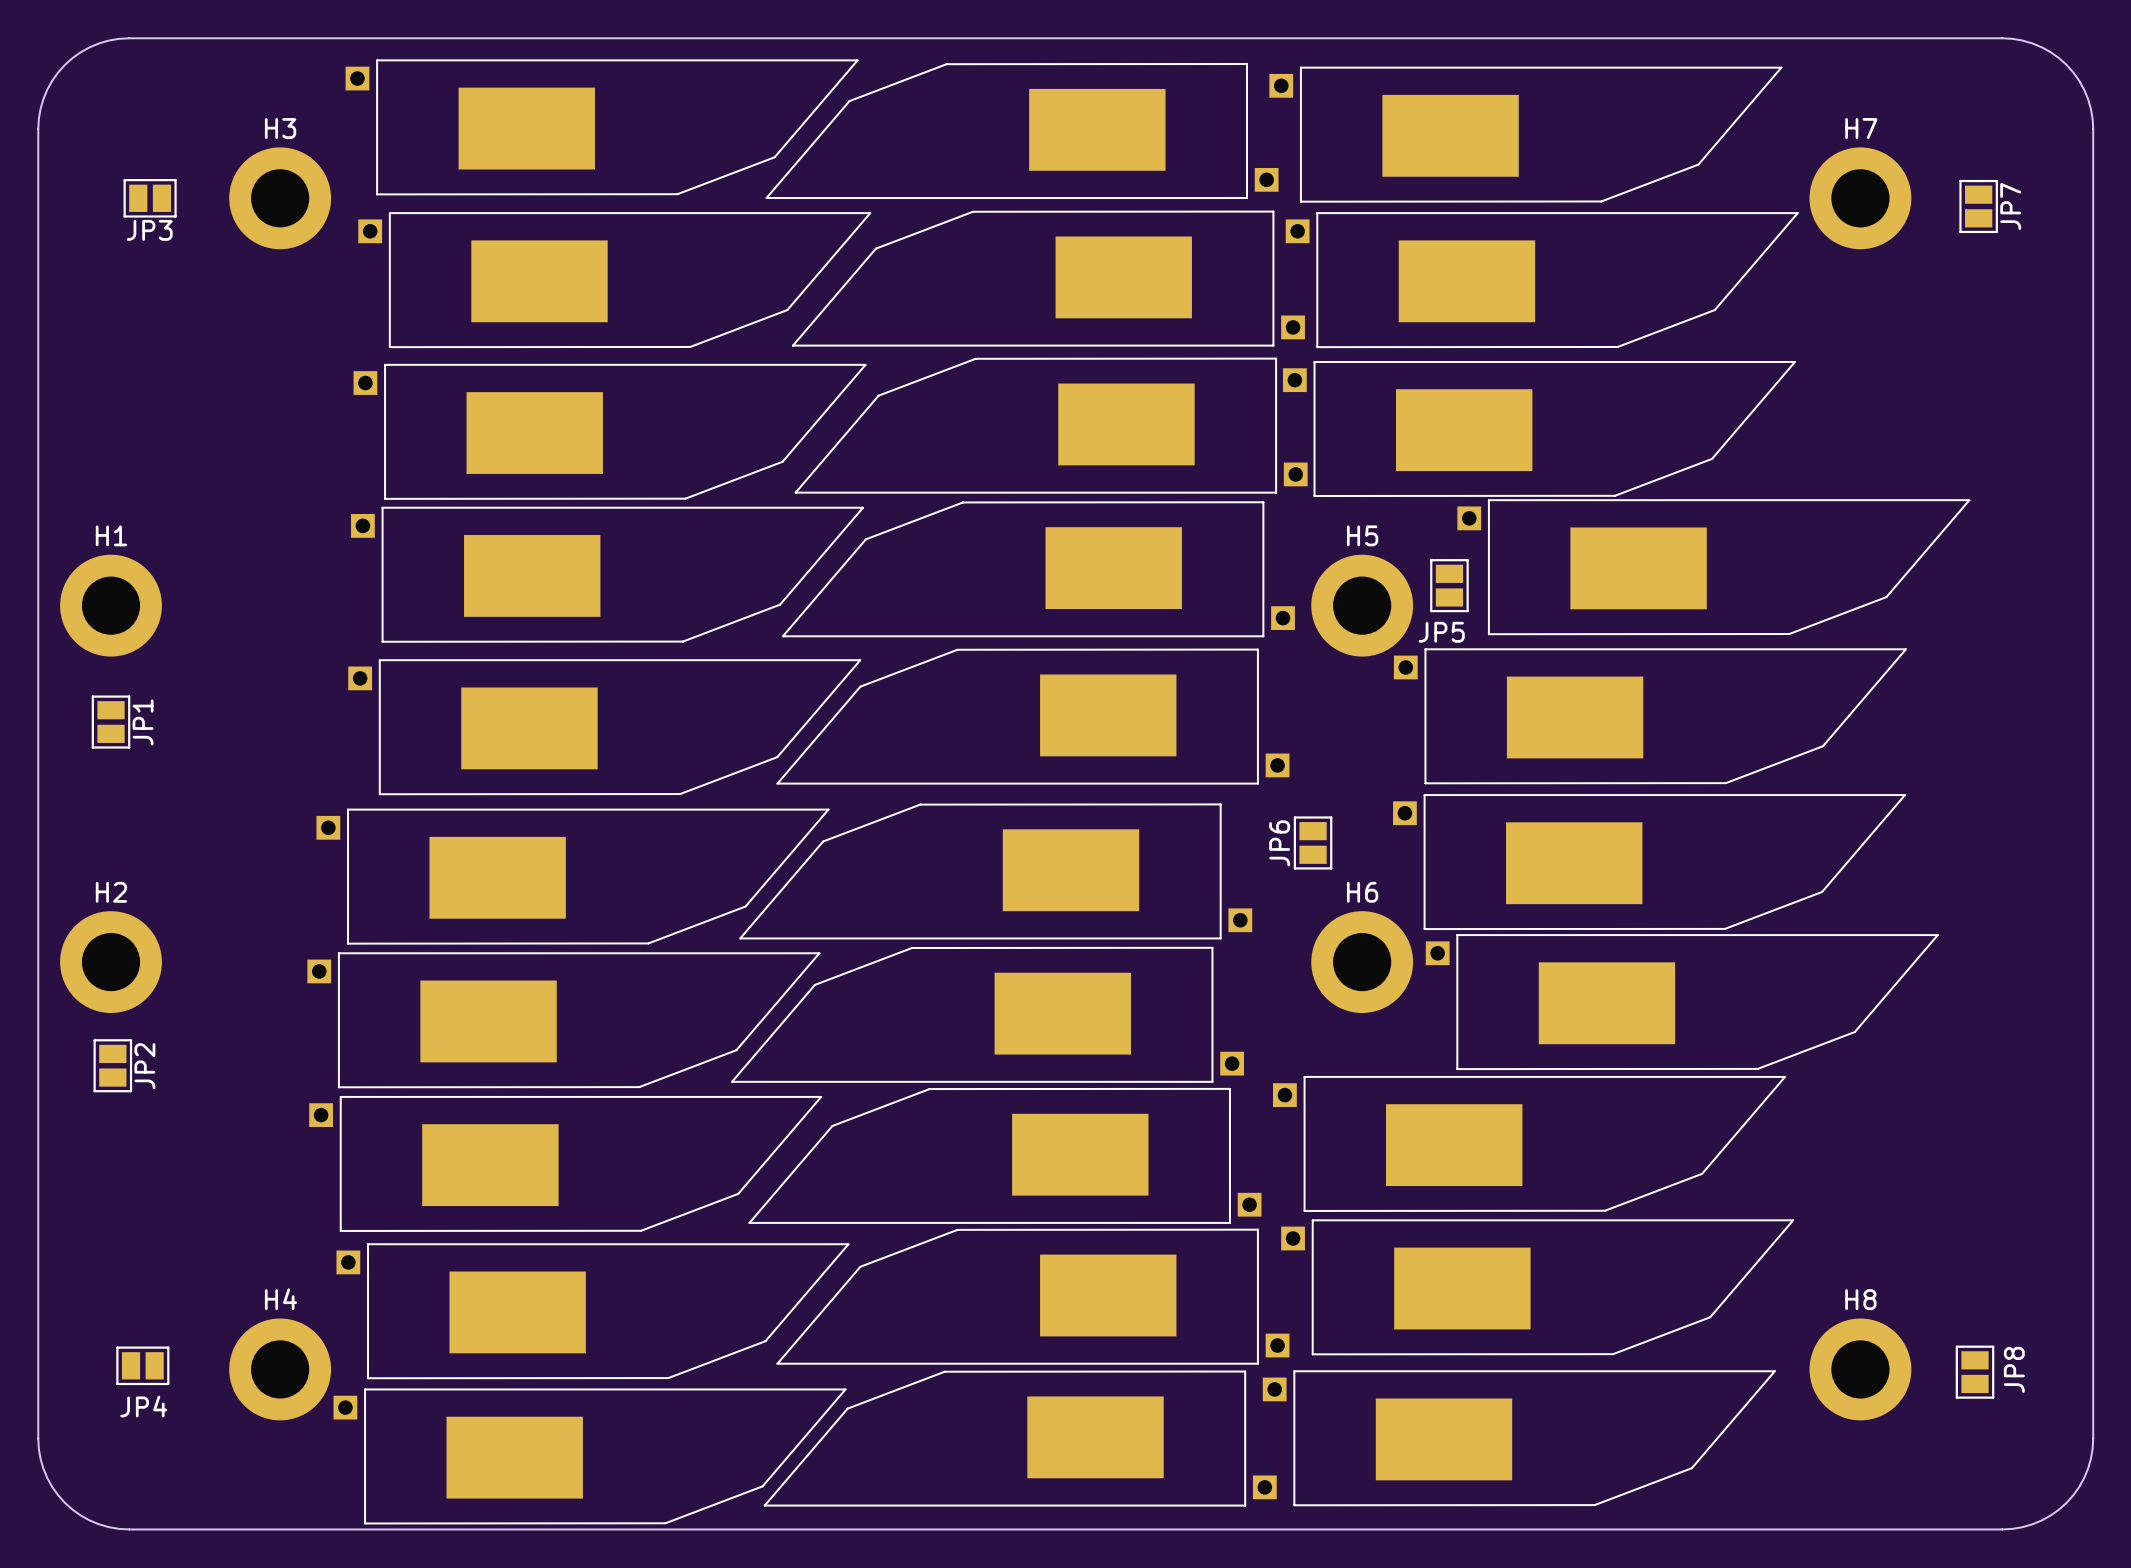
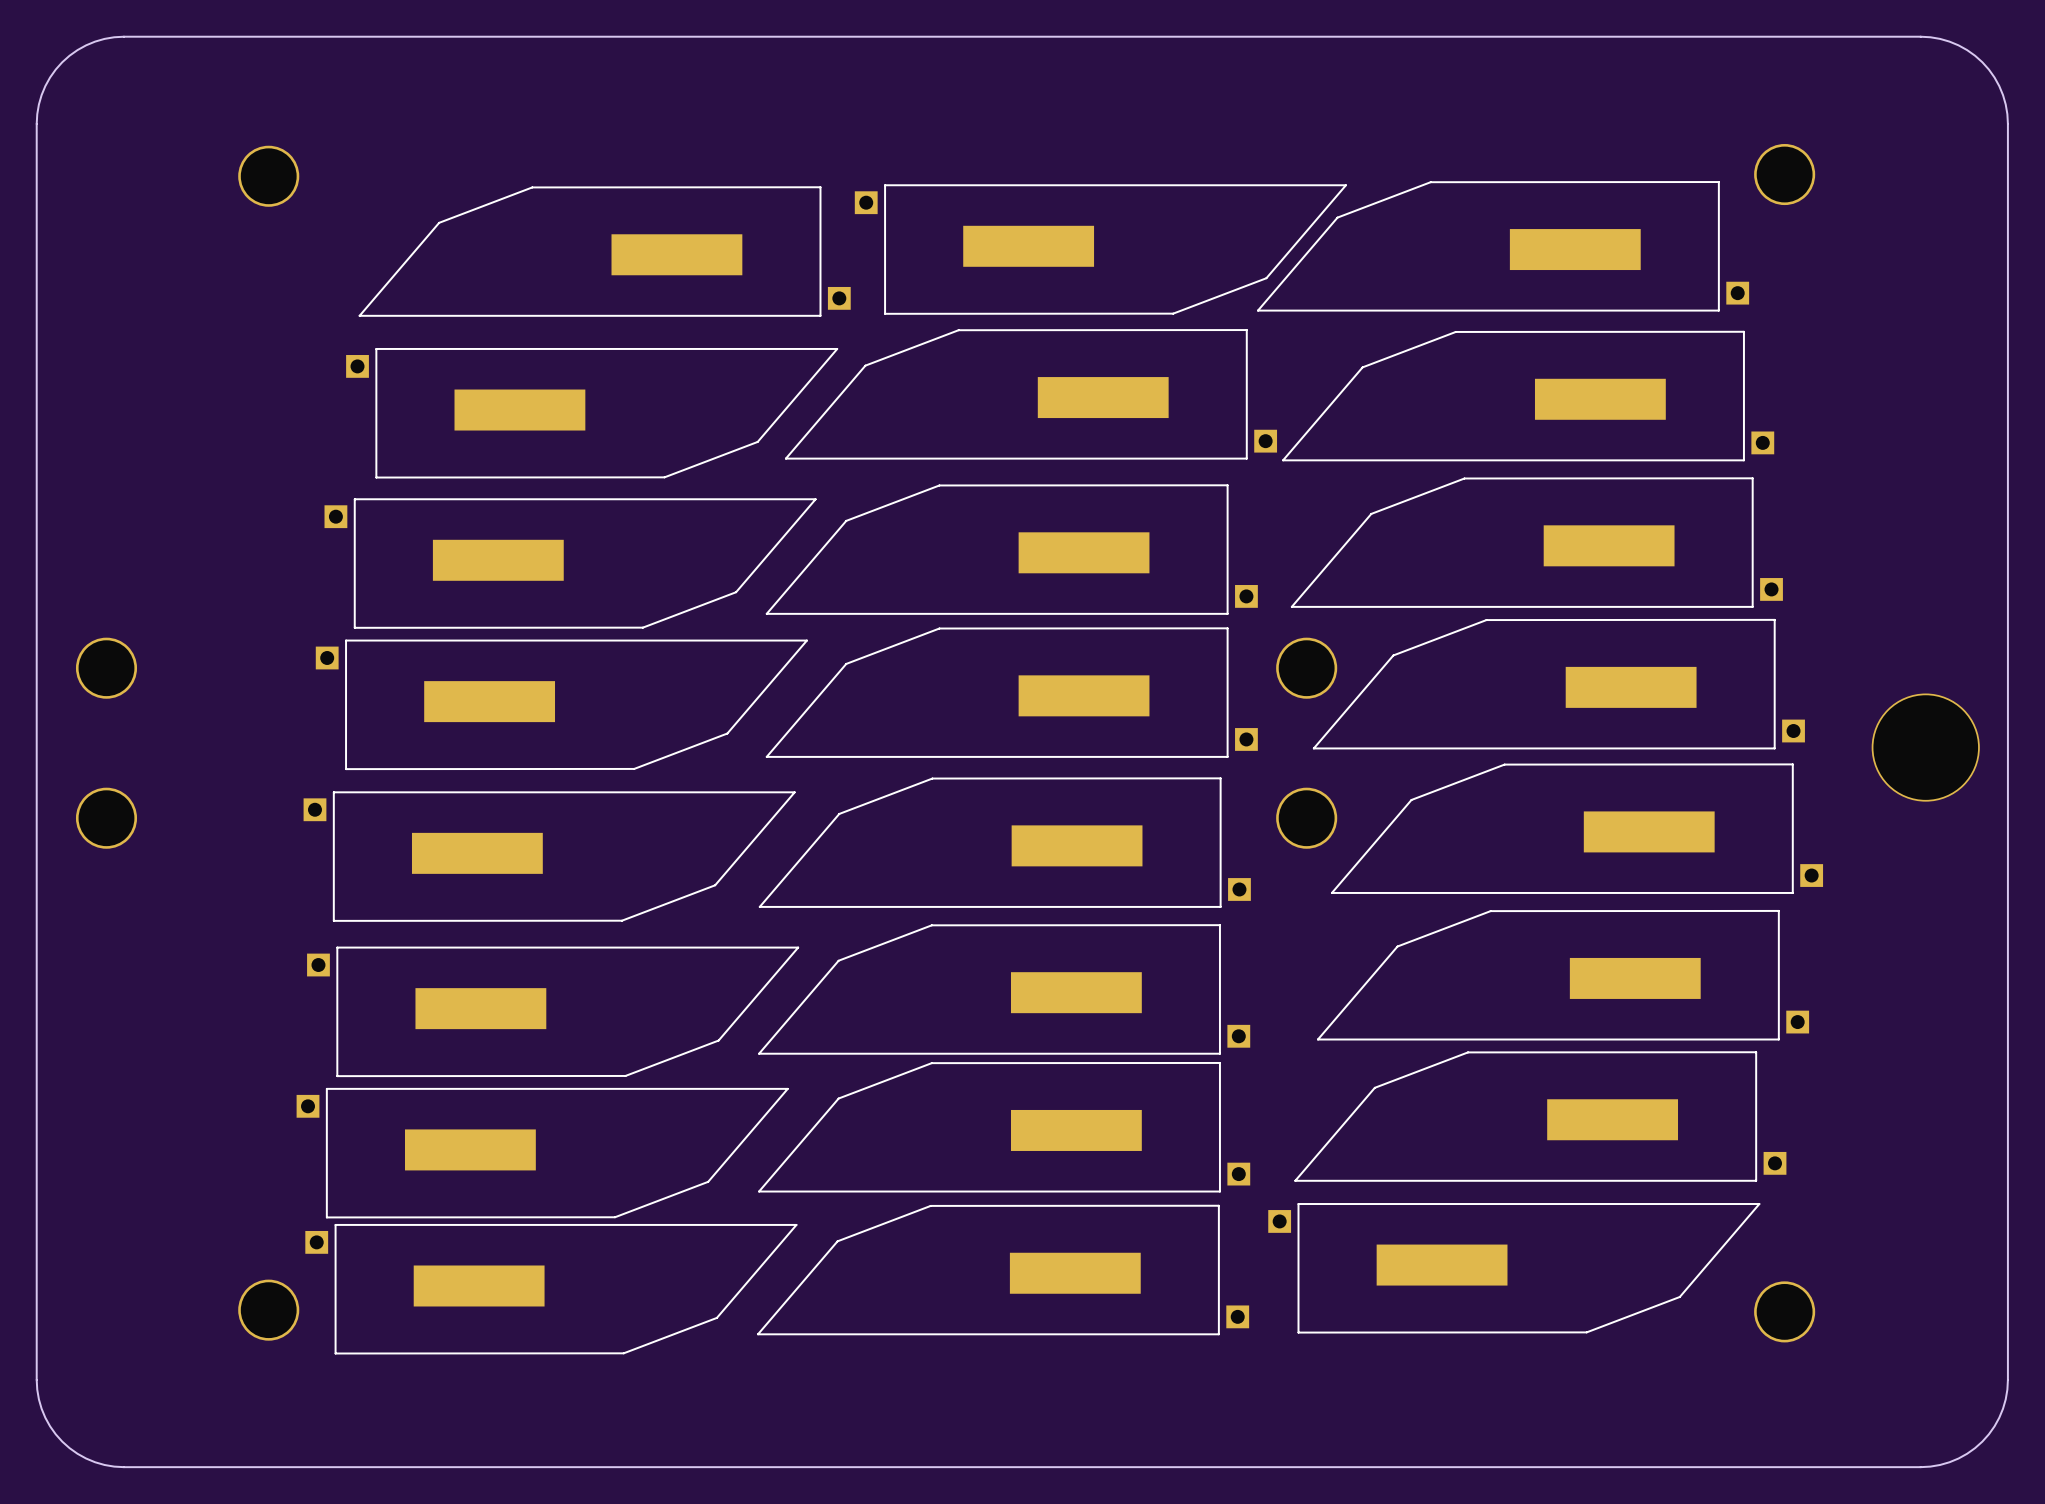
part: (602, 127) -> none
part: (1022, 131) -> none
part: (1525, 134) -> none
part: none -> (1784, 174)
part: none -> (268, 176)
JP3: (150, 198) -> none
H3: (280, 198) -> none
H7: (1860, 198) -> none
JP7: (1978, 206) -> none
part: none -> (1503, 246)
part: none -> (1100, 249)
part: none -> (604, 251)
part: (1048, 278) -> none
part: (614, 280) -> none
part: (1542, 280) -> none
part footprint: [353, 363, 867, 500] -> [346, 348, 839, 479]
part: none -> (1031, 394)
part: none -> (1528, 396)
part: (1051, 425) -> none
part: (1539, 428) -> none
part footprint: [782, 501, 1295, 638] -> [765, 484, 1258, 615]
part footprint: [351, 506, 864, 643] -> [324, 498, 817, 629]
part: none -> (1536, 542)
part: (1713, 567) -> none
JP5: (1449, 585) -> none
H1: (111, 605) -> none
H5: (1362, 605) -> none
part: none -> (106, 668)
part: none -> (1306, 668)
part: none -> (1558, 684)
part: (1033, 716) -> none
part: (1650, 716) -> none
JP1: (111, 722) -> none
part: none -> (1011, 692)
part: (604, 727) -> none
part: none -> (561, 704)
part: none -> (1925, 747)
part footprint: [1393, 794, 1906, 930] -> [1331, 763, 1824, 894]
part footprint: [316, 808, 830, 945] -> [303, 791, 796, 922]
JP6: (1313, 842) -> none
part: none -> (106, 818)
part: none -> (1306, 818)
part: (995, 871) -> none
part: none -> (1004, 842)
H2: (111, 962) -> none
H6: (1362, 962) -> none
part: (1682, 1002) -> none
part: (987, 1014) -> none
part: none -> (1563, 975)
part: (563, 1020) -> none
part: none -> (1004, 989)
part: none -> (553, 1011)
JP2: (112, 1065) -> none
part: (1529, 1143) -> none
part: (1005, 1155) -> none
part: (565, 1163) -> none
part: none -> (1540, 1116)
part: none -> (1004, 1127)
part: none -> (542, 1153)
part: (1537, 1287) -> none
part: (1033, 1296) -> none
part: (592, 1311) -> none
part: none -> (1514, 1268)
part: none -> (1003, 1270)
part: none -> (551, 1289)
JP4: (142, 1365) -> none
part: none -> (268, 1310)
part: none -> (1784, 1311)
H4: (280, 1369) -> none
H8: (1860, 1369) -> none
JP8: (1975, 1372) -> none
part: (1020, 1438) -> none
part: (1519, 1438) -> none
part: (589, 1456) -> none

